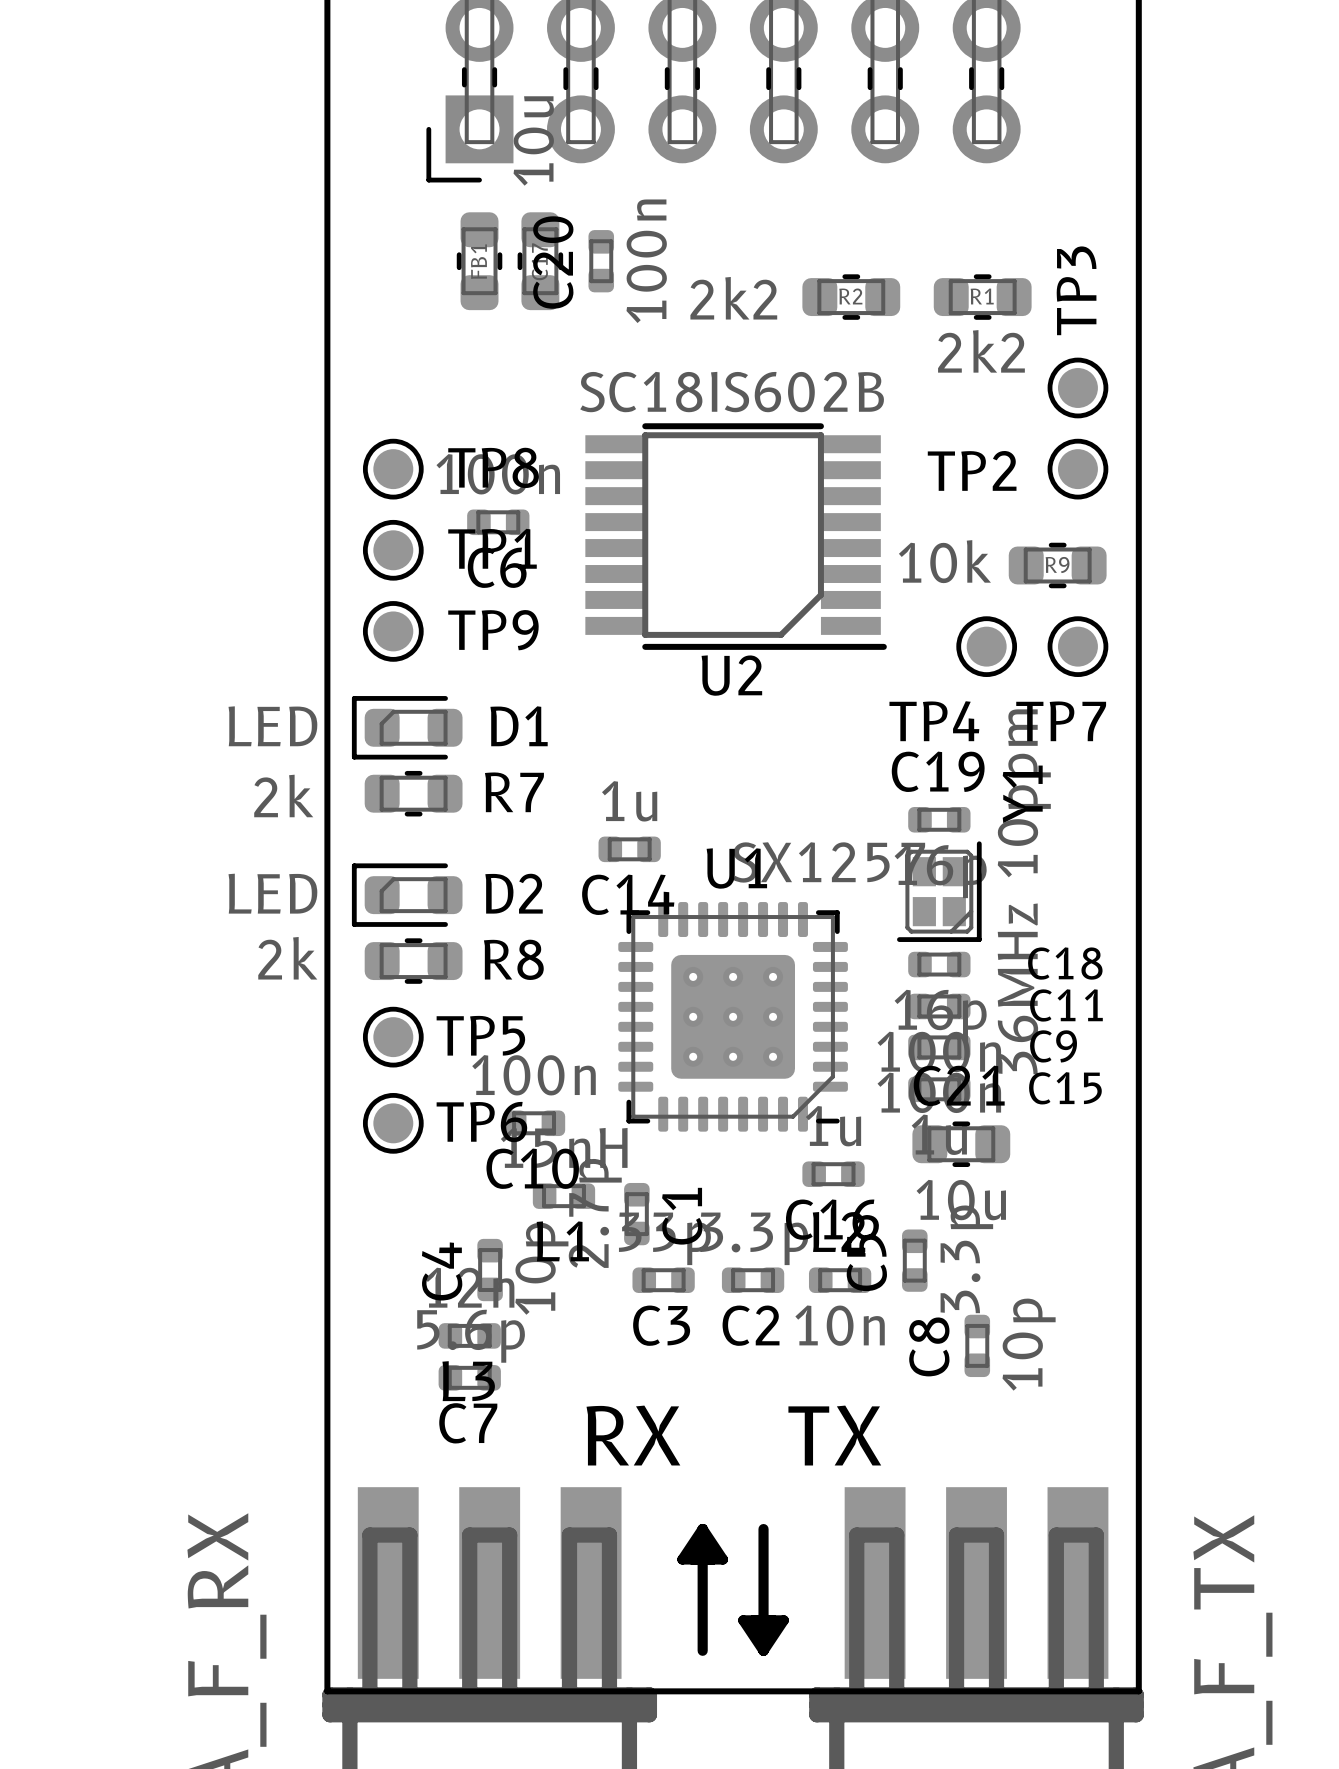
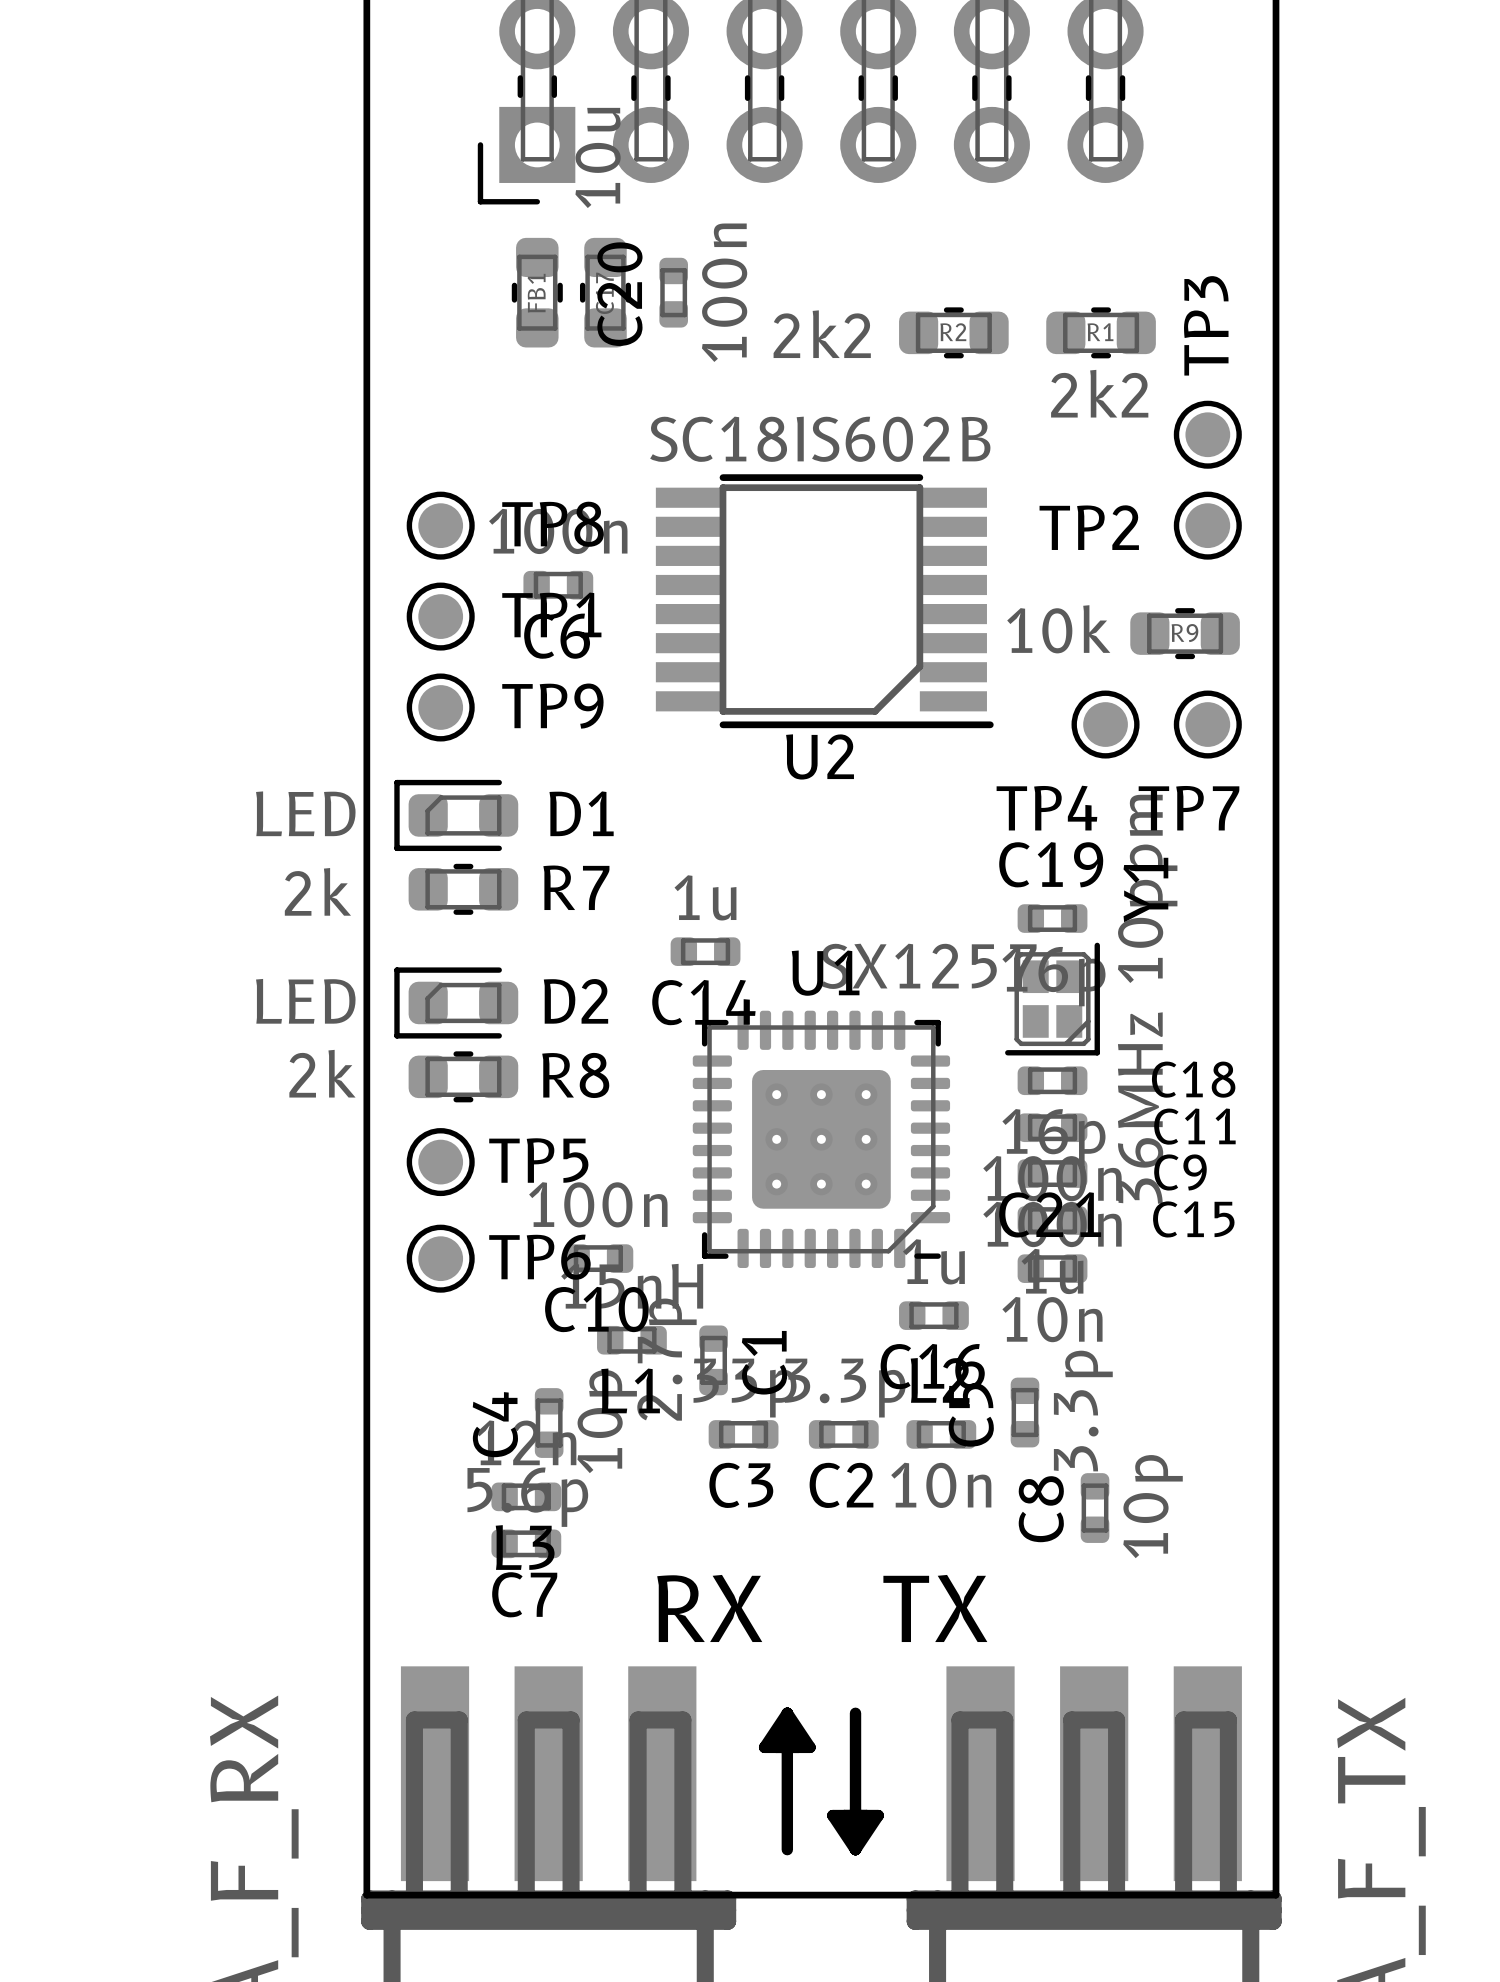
C21 footprint: [912, 1121, 1011, 1168] -> [1017, 1254, 1088, 1283]
C21 value: 10u (961, 1200) -> 10n (1052, 1319)

